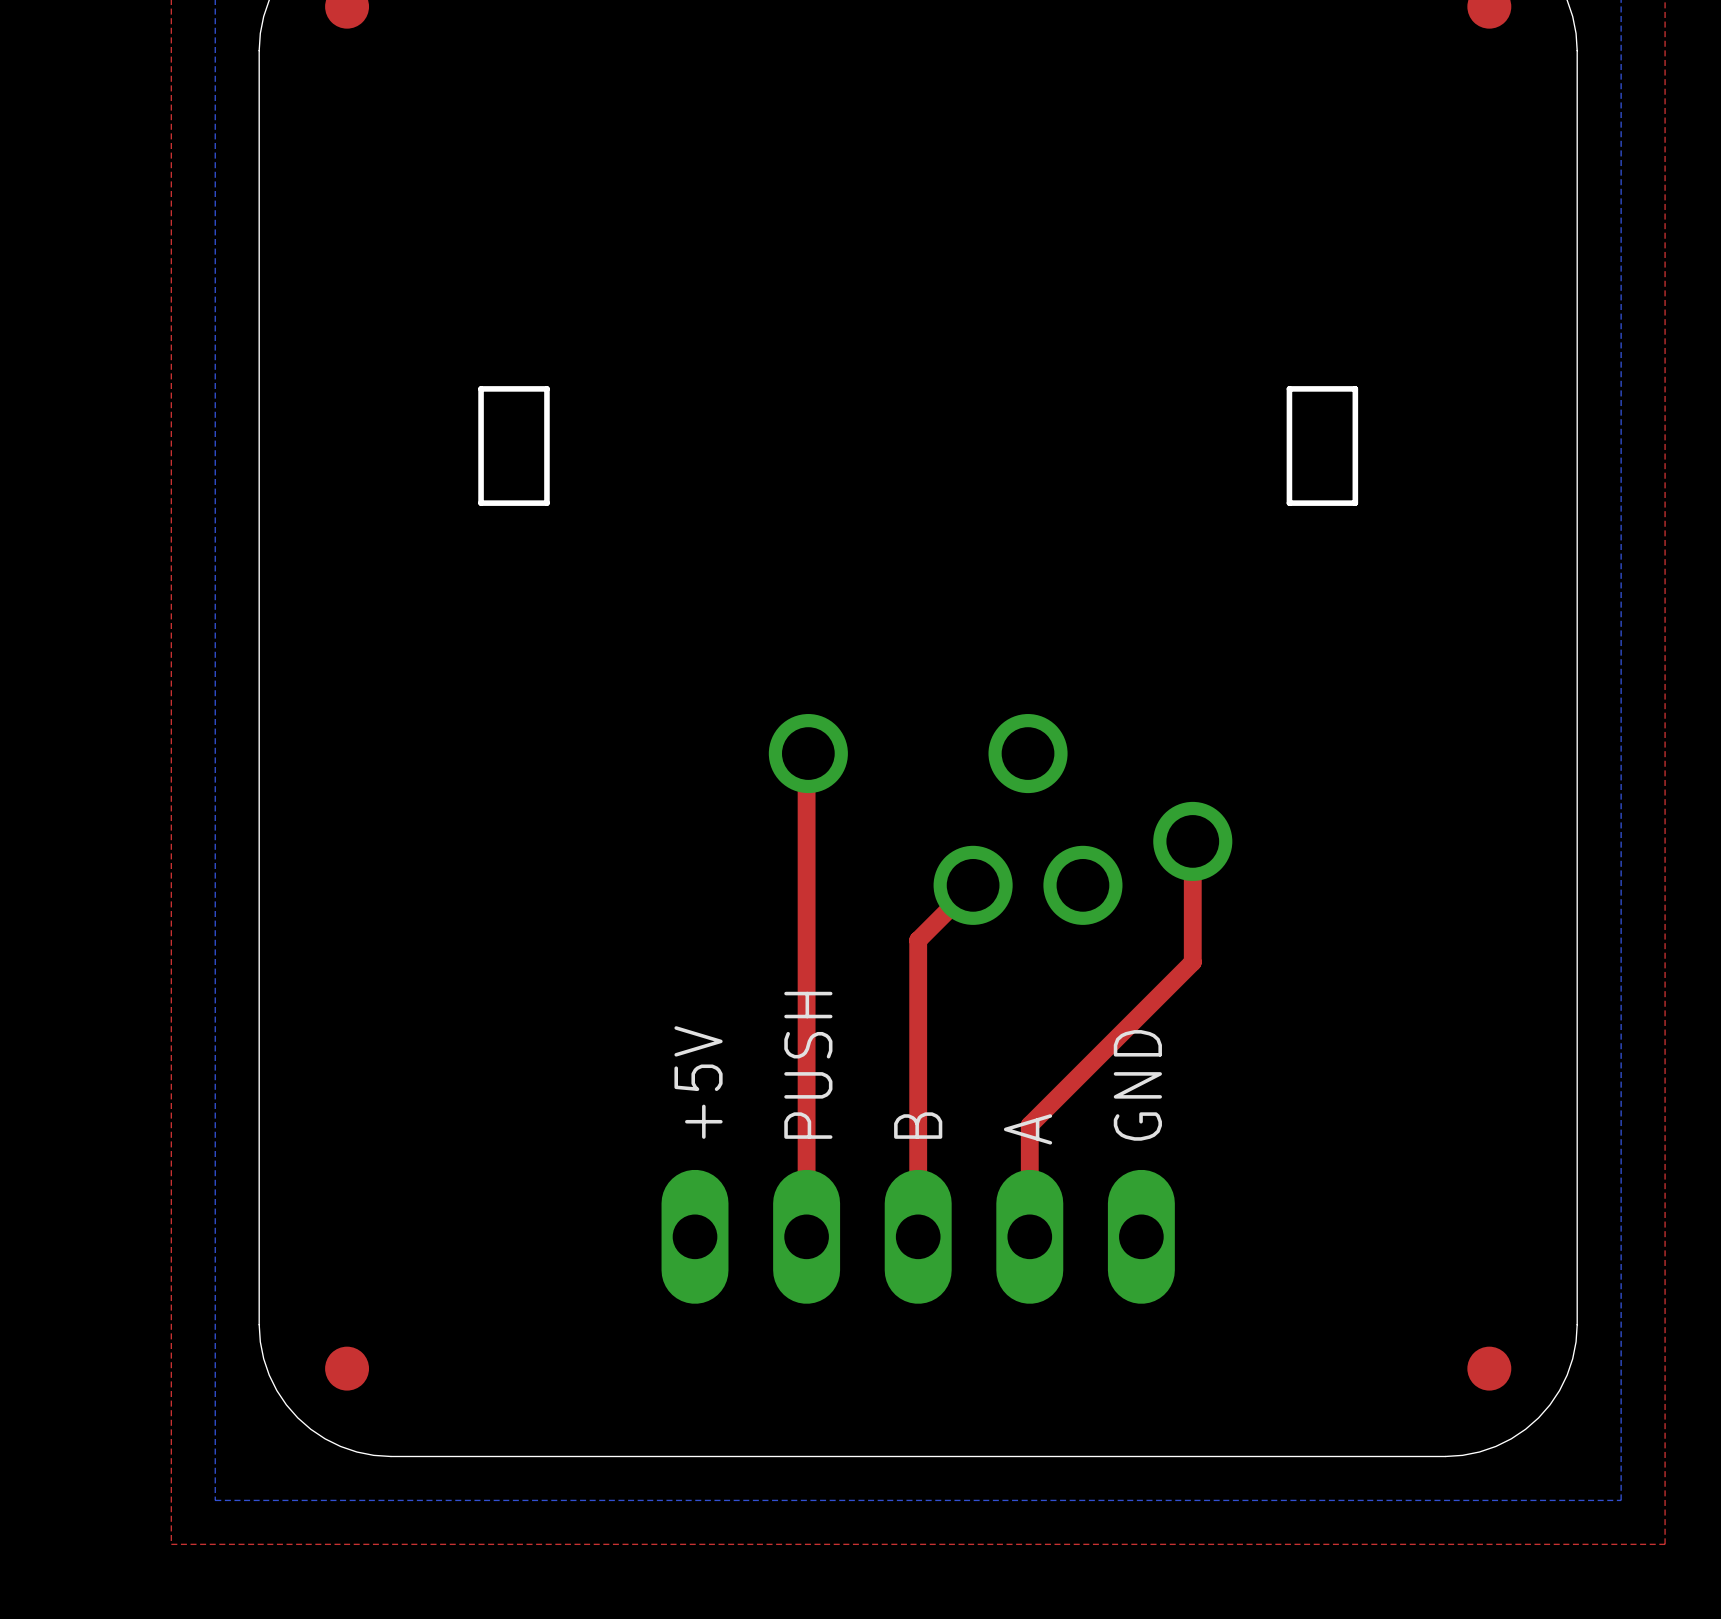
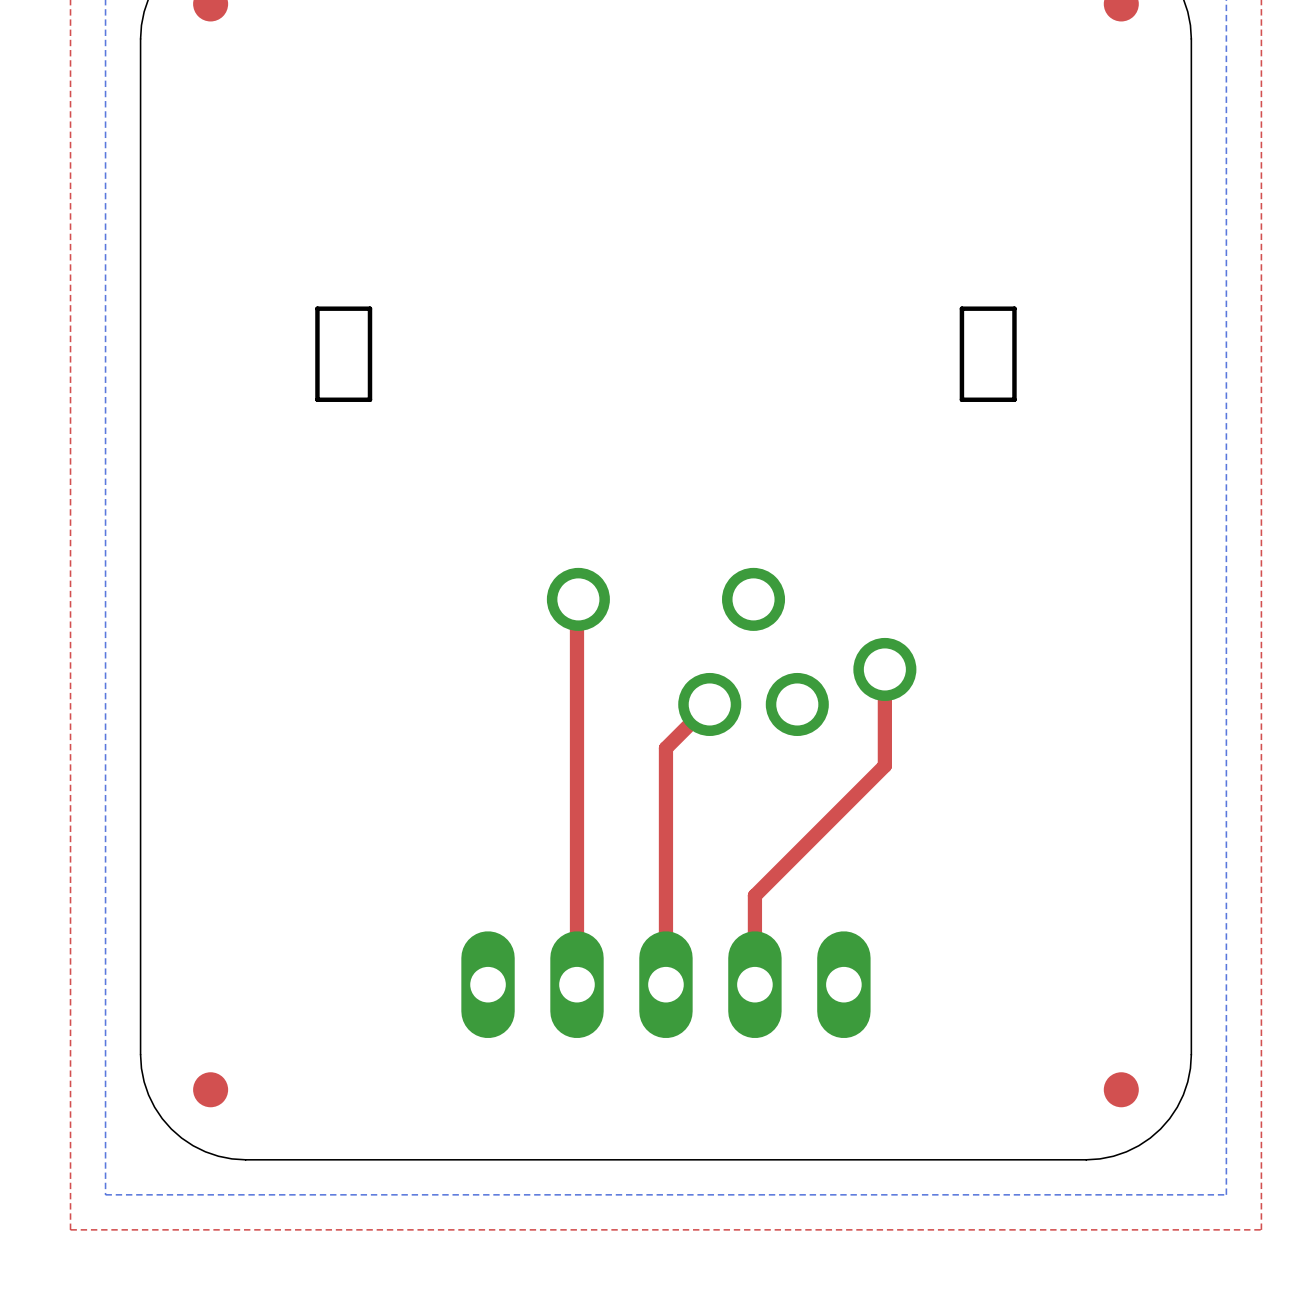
text: PUSH (808, 1065) -> none
text: +5V (698, 1082) -> none
text: GND (1137, 1085) -> none
text: B (918, 1125) -> none
text: A (1028, 1129) -> none

